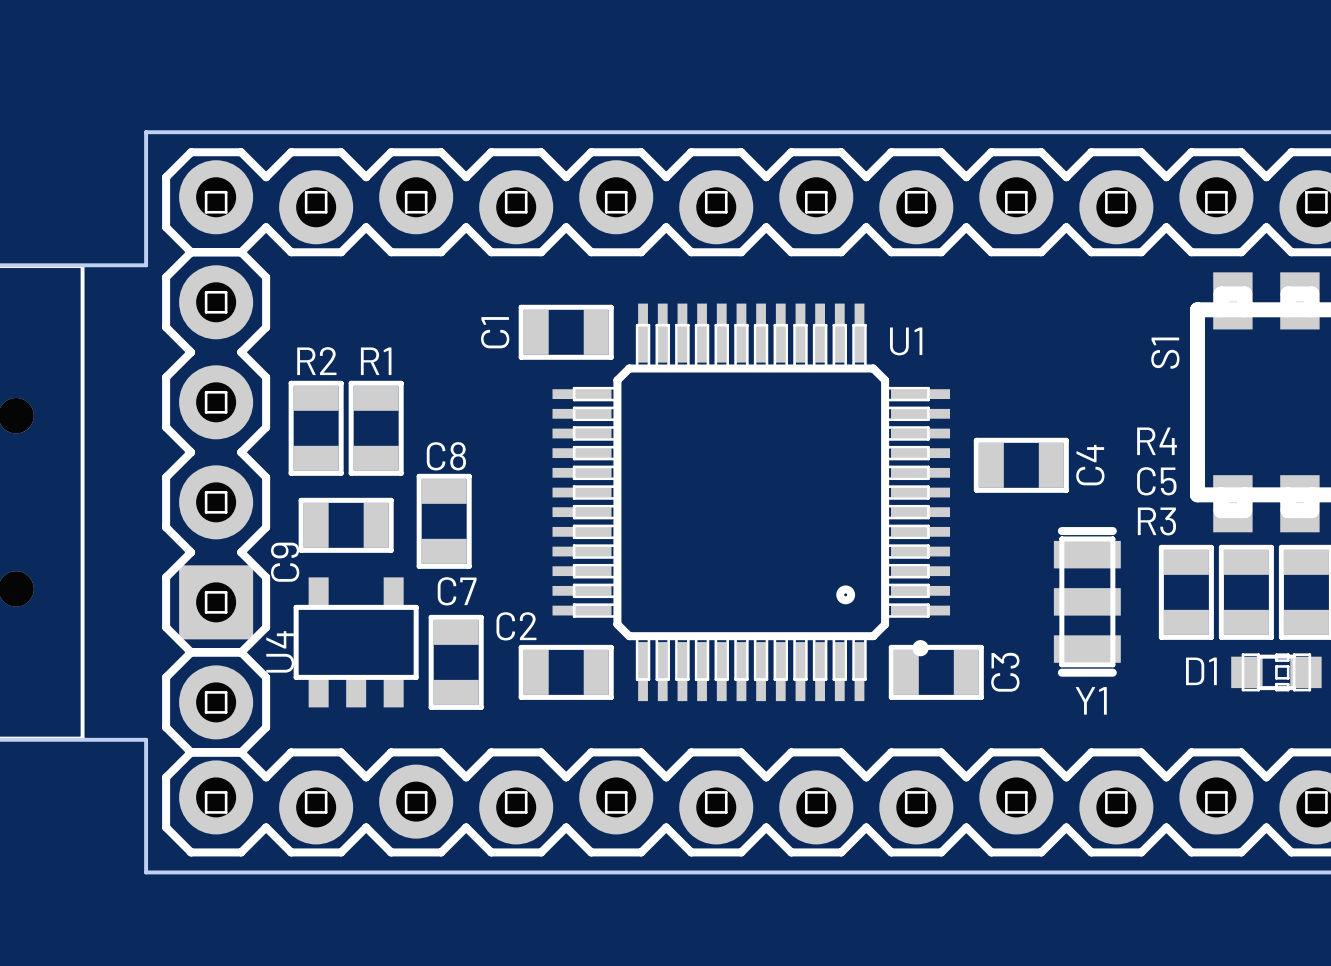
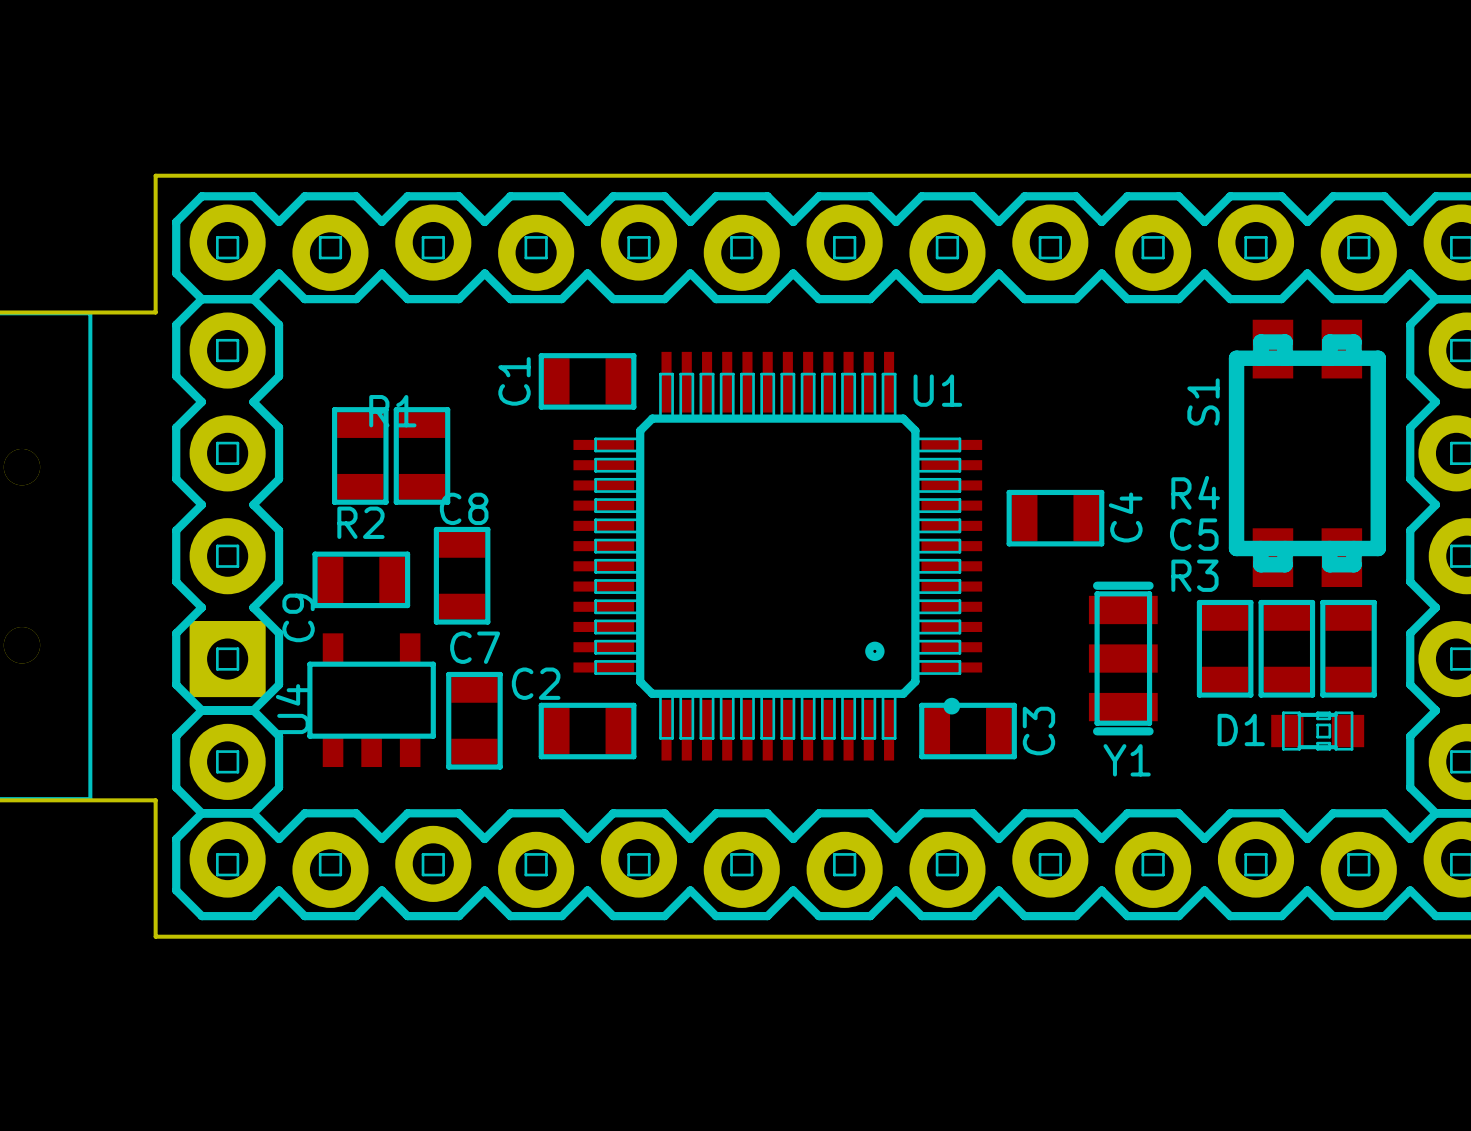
R2 name position: R2 (316, 361) -> R2 (360, 522)
R2 position: (316, 428) -> (360, 455)
R1 position: (376, 428) -> (421, 455)

